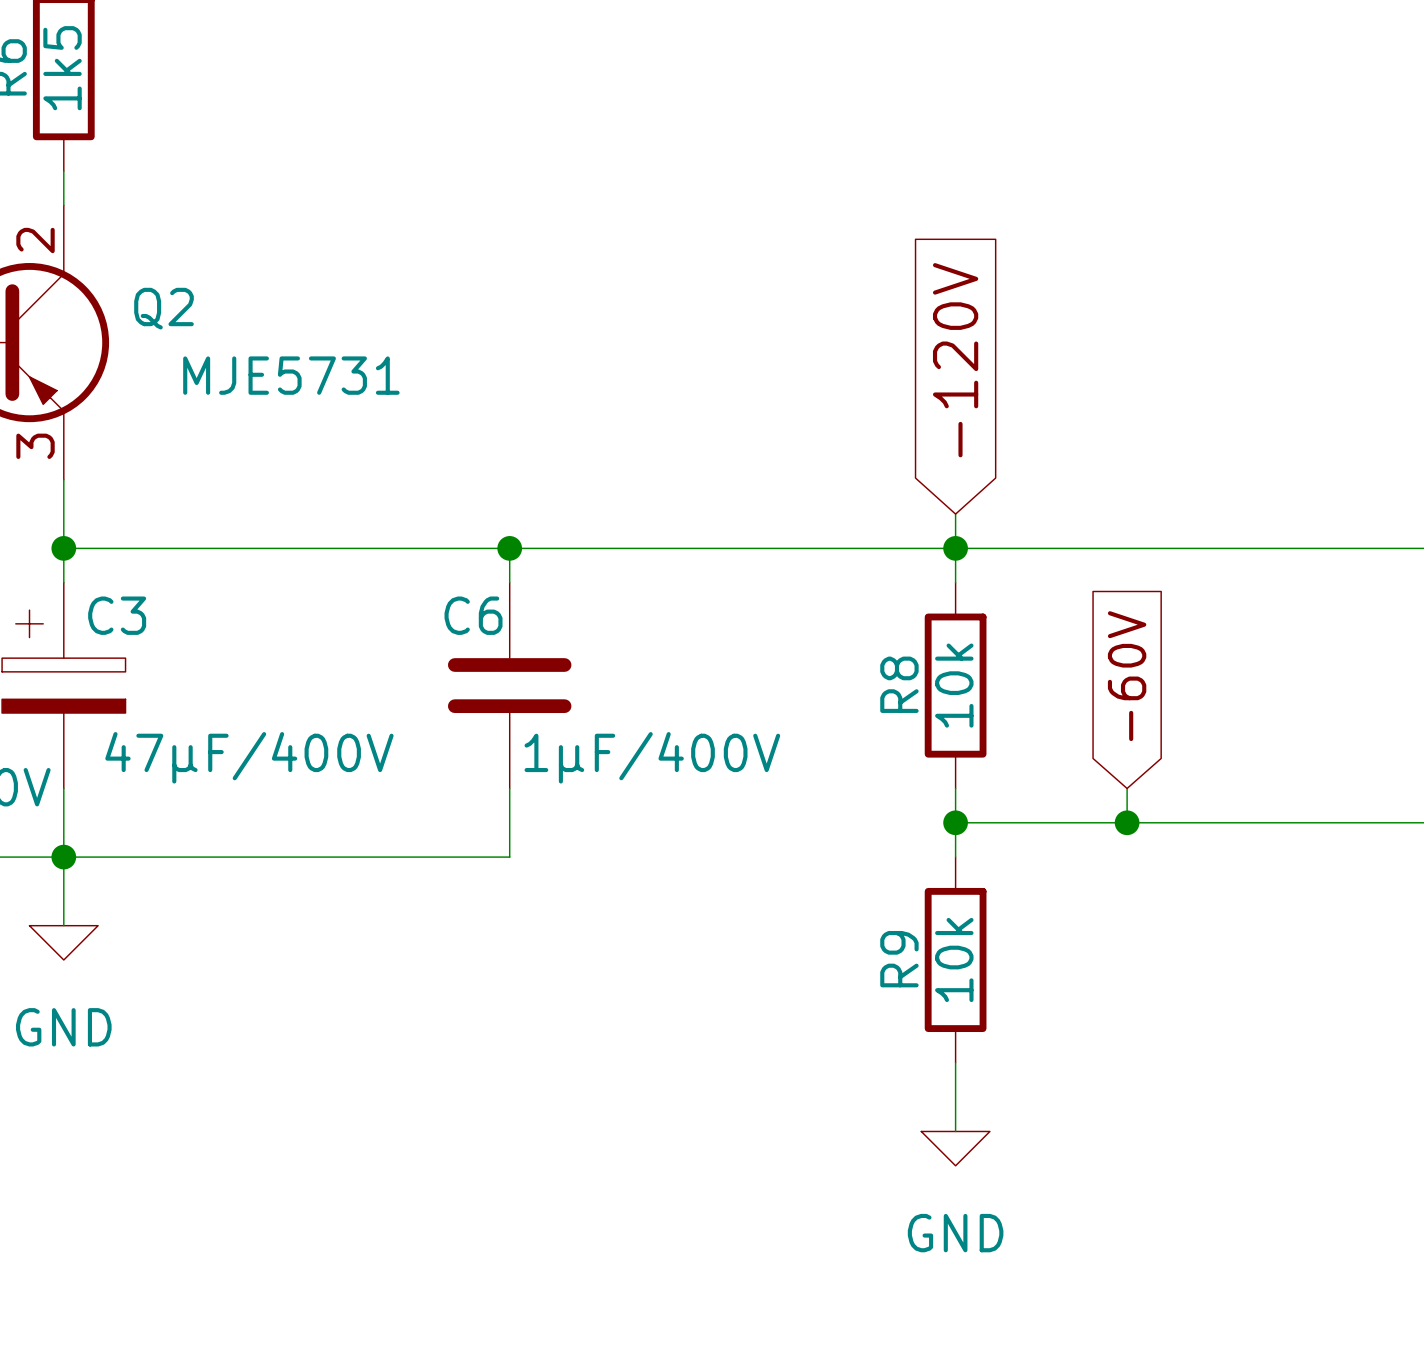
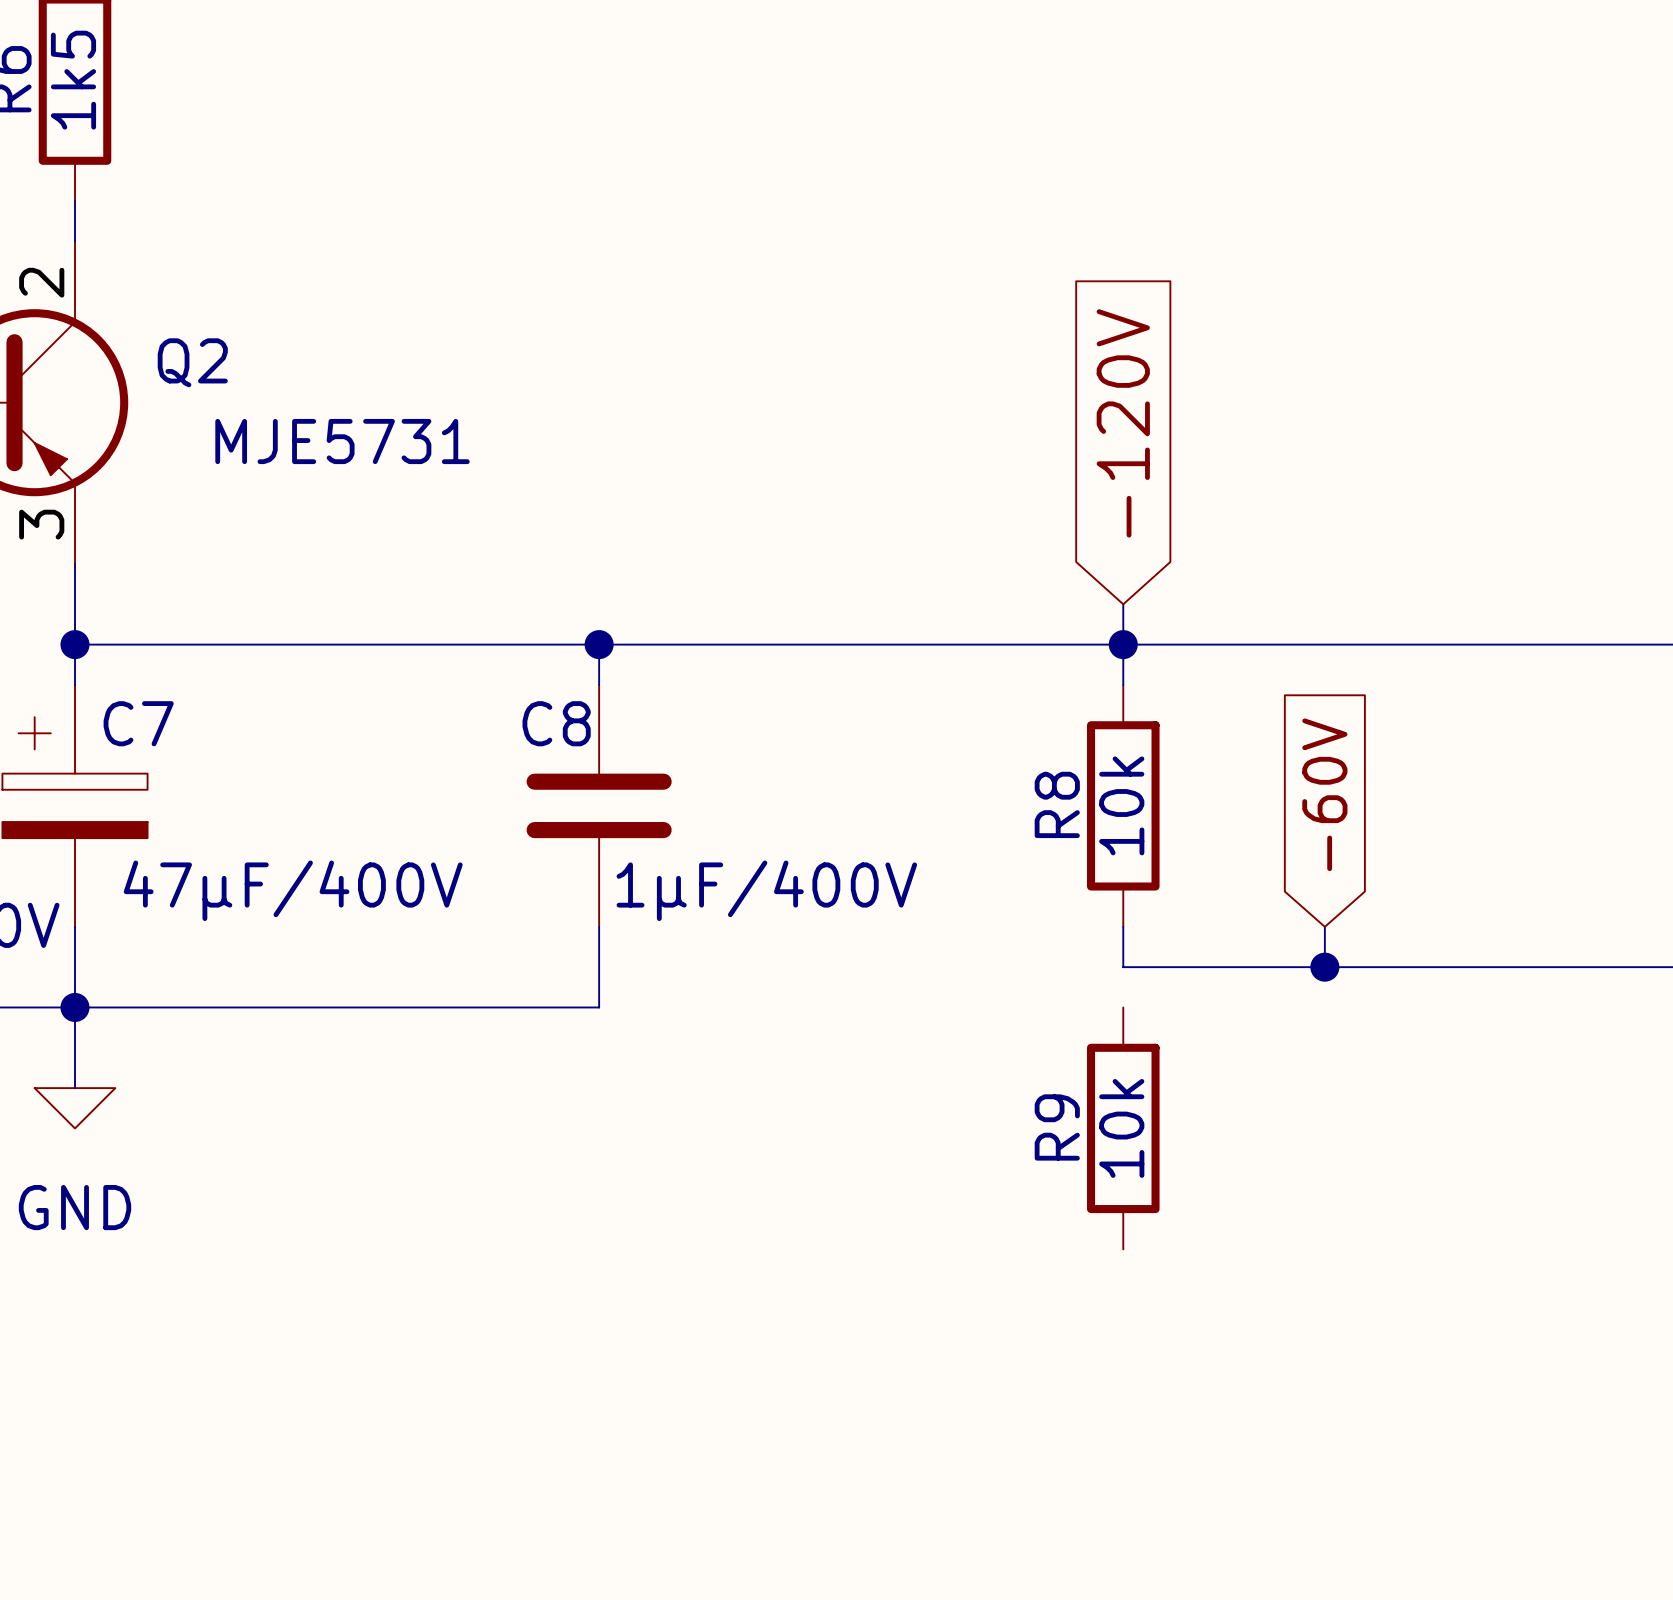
C3 name: C3 (117, 615) -> C7 (138, 723)
C6 name: C6 (473, 615) -> C8 (556, 723)
wire: (955, 822) (955, 857) -> none
junction: (955, 822) -> none
wire: (955, 1062) (955, 1131) -> none
power symbol: GND (955, 1148) -> none

